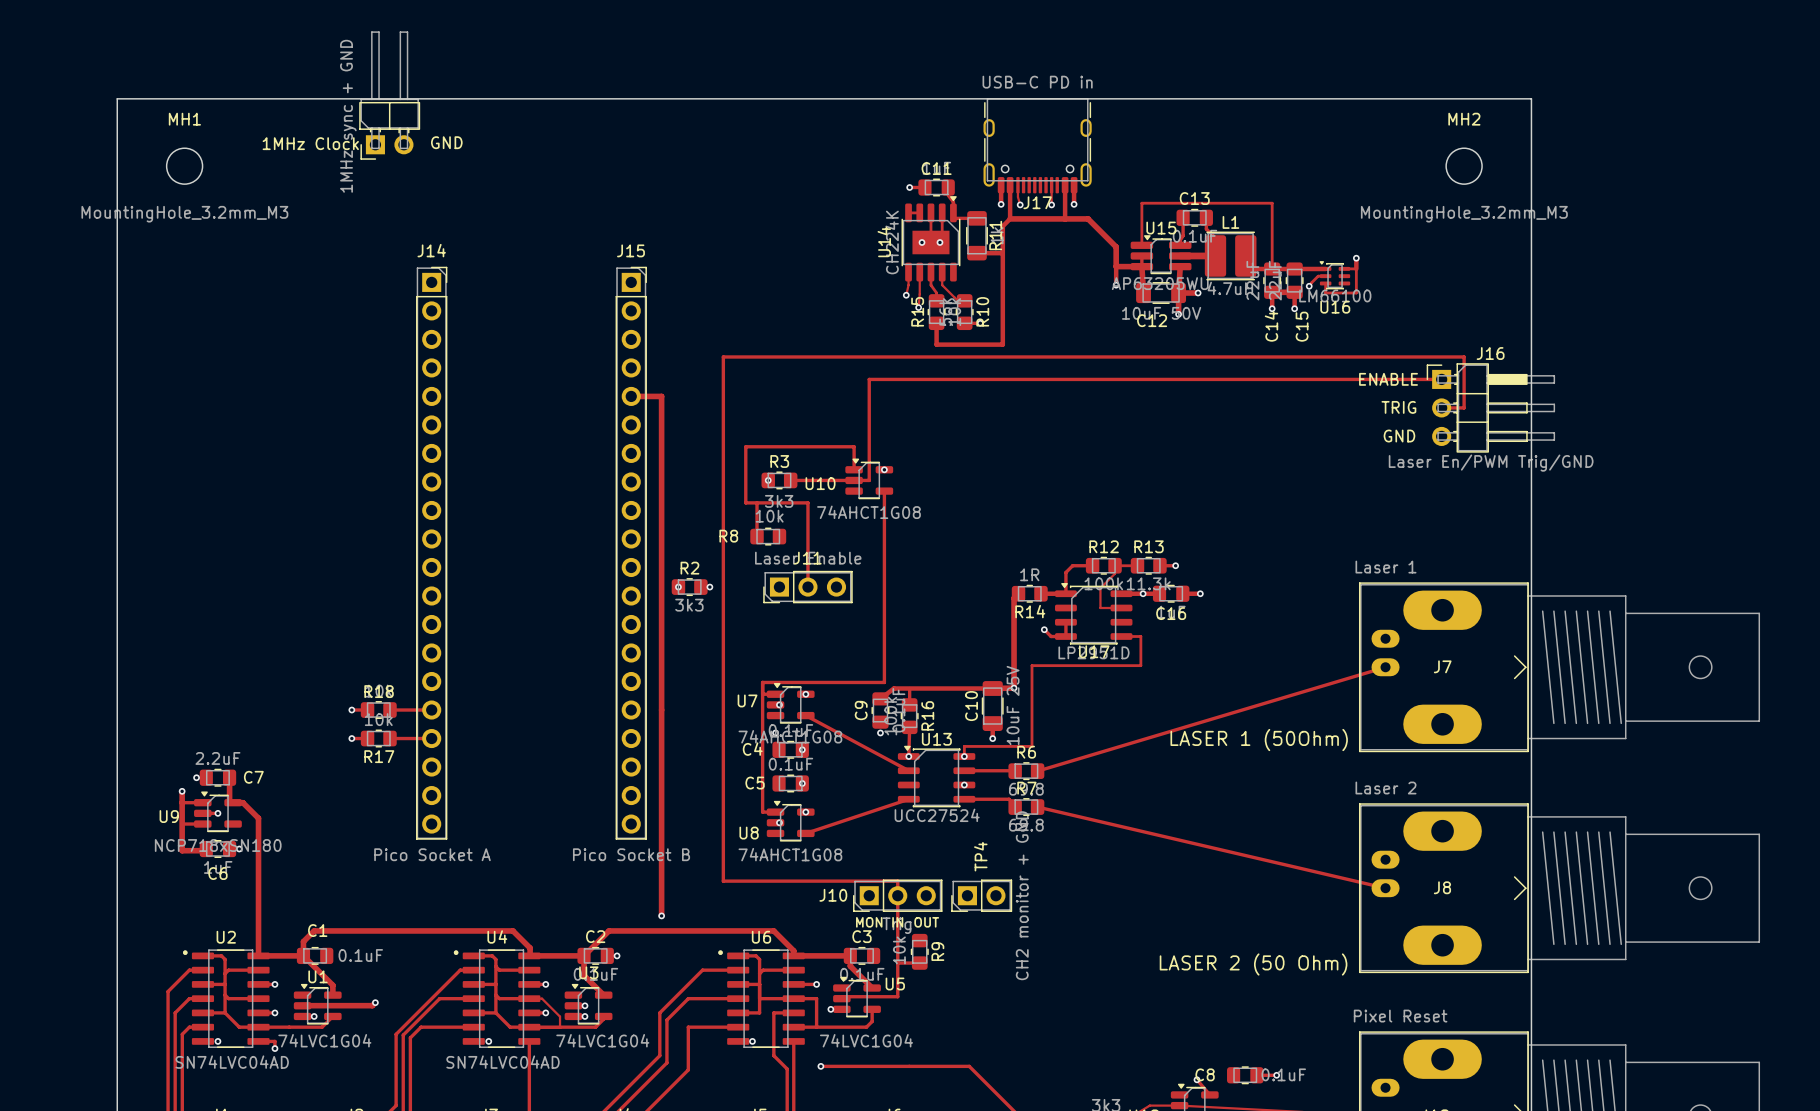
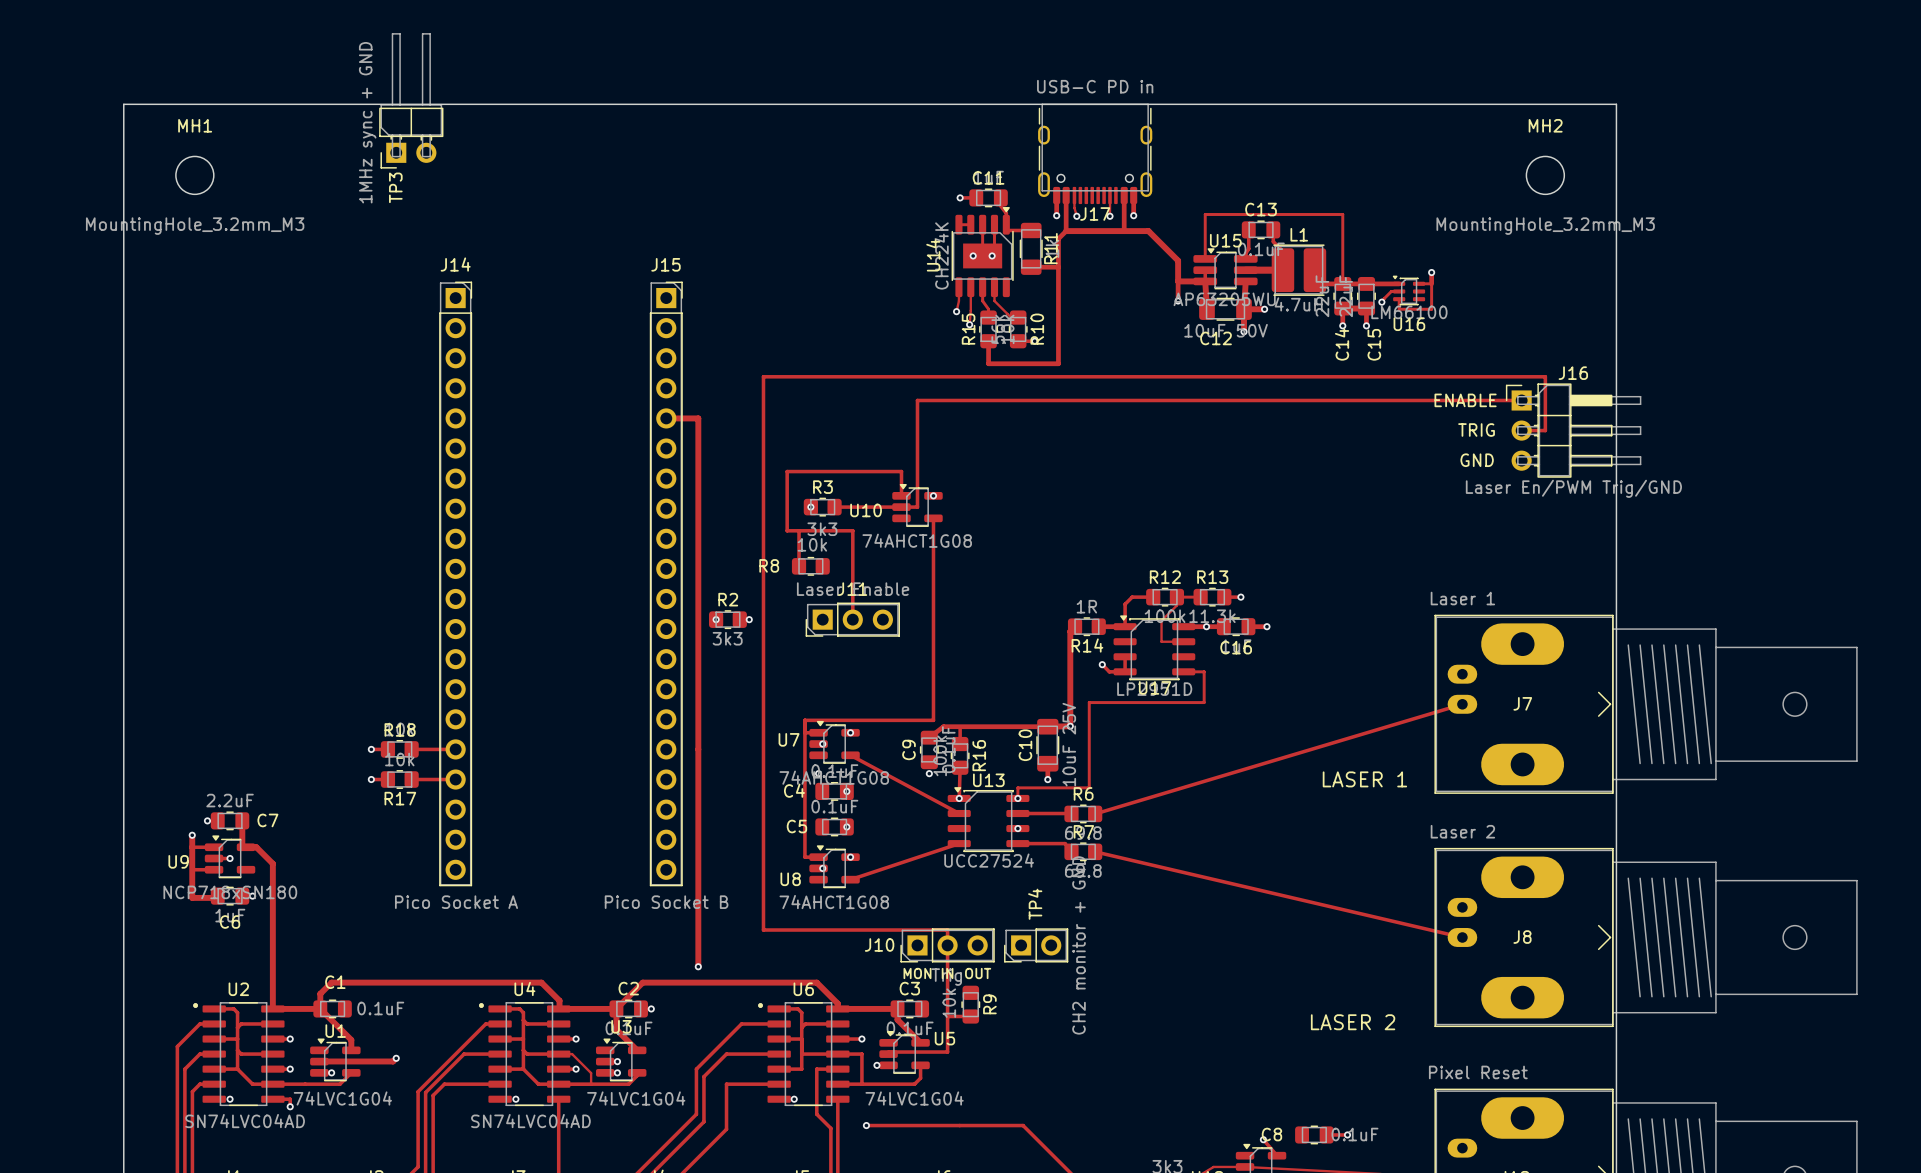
text: GND (446, 142) -> none
1MHz Clock name: 1MHz Clock (310, 143) -> TP3 (395, 187)
text: LASER 1 (50Ohm) (1259, 740) -> LASER 1 (1364, 779)
text: LASER 2 (50 Ohm) (1253, 964) -> LASER 2 (1353, 1022)

